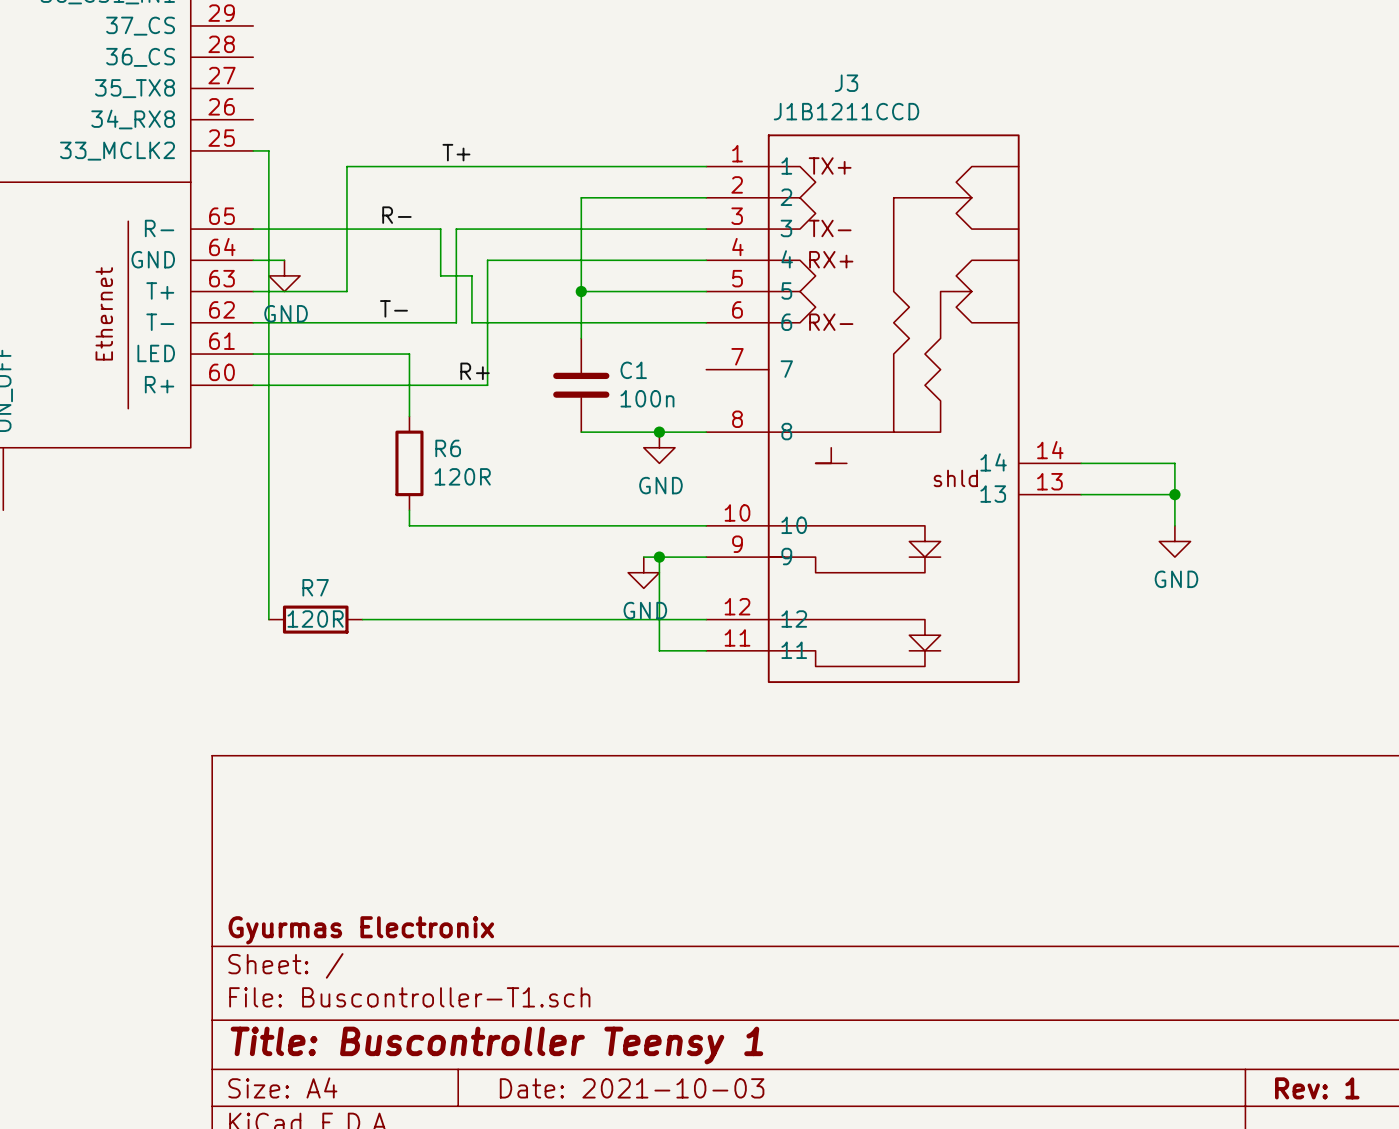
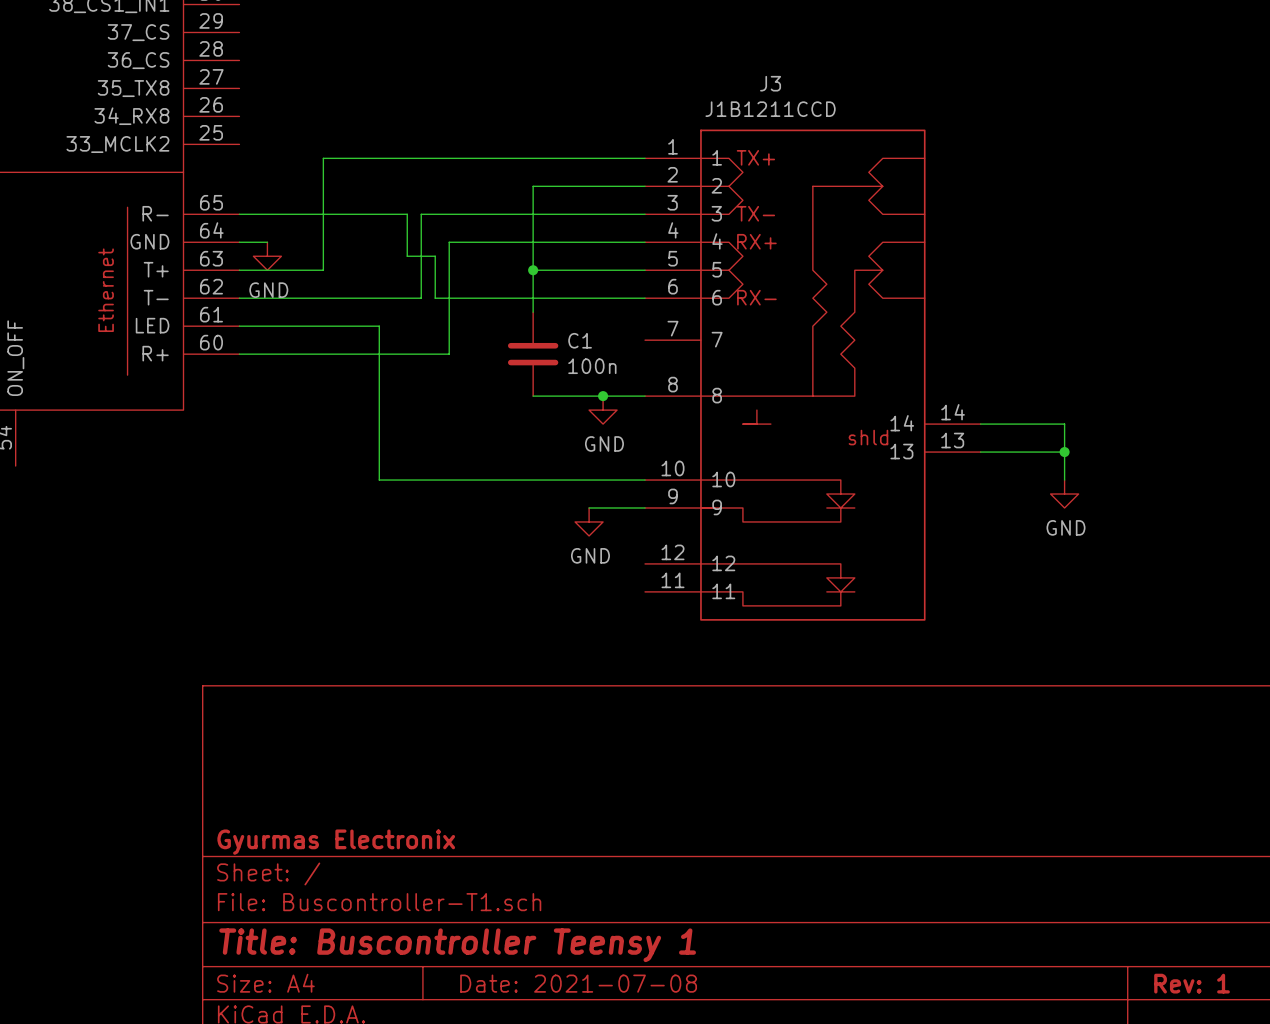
wire: (253, 150) (268, 150) (268, 619) -> none
label: T+ (456, 152) -> none
label: R- (396, 215) -> none
label: T- (393, 308) -> none
label: R+ (475, 371) -> none
wire: none -> (379, 382) (379, 466)
R6: 120R (409, 463) -> none
wire: (659, 557) (659, 650) (706, 650) -> none
junction: (659, 557) -> none
R7: 120R (315, 619) -> none
wire: (362, 619) (706, 619) -> none
title block: Date: 2021-10-03 (632, 1088) -> Date: 2021-07-08 (578, 983)

